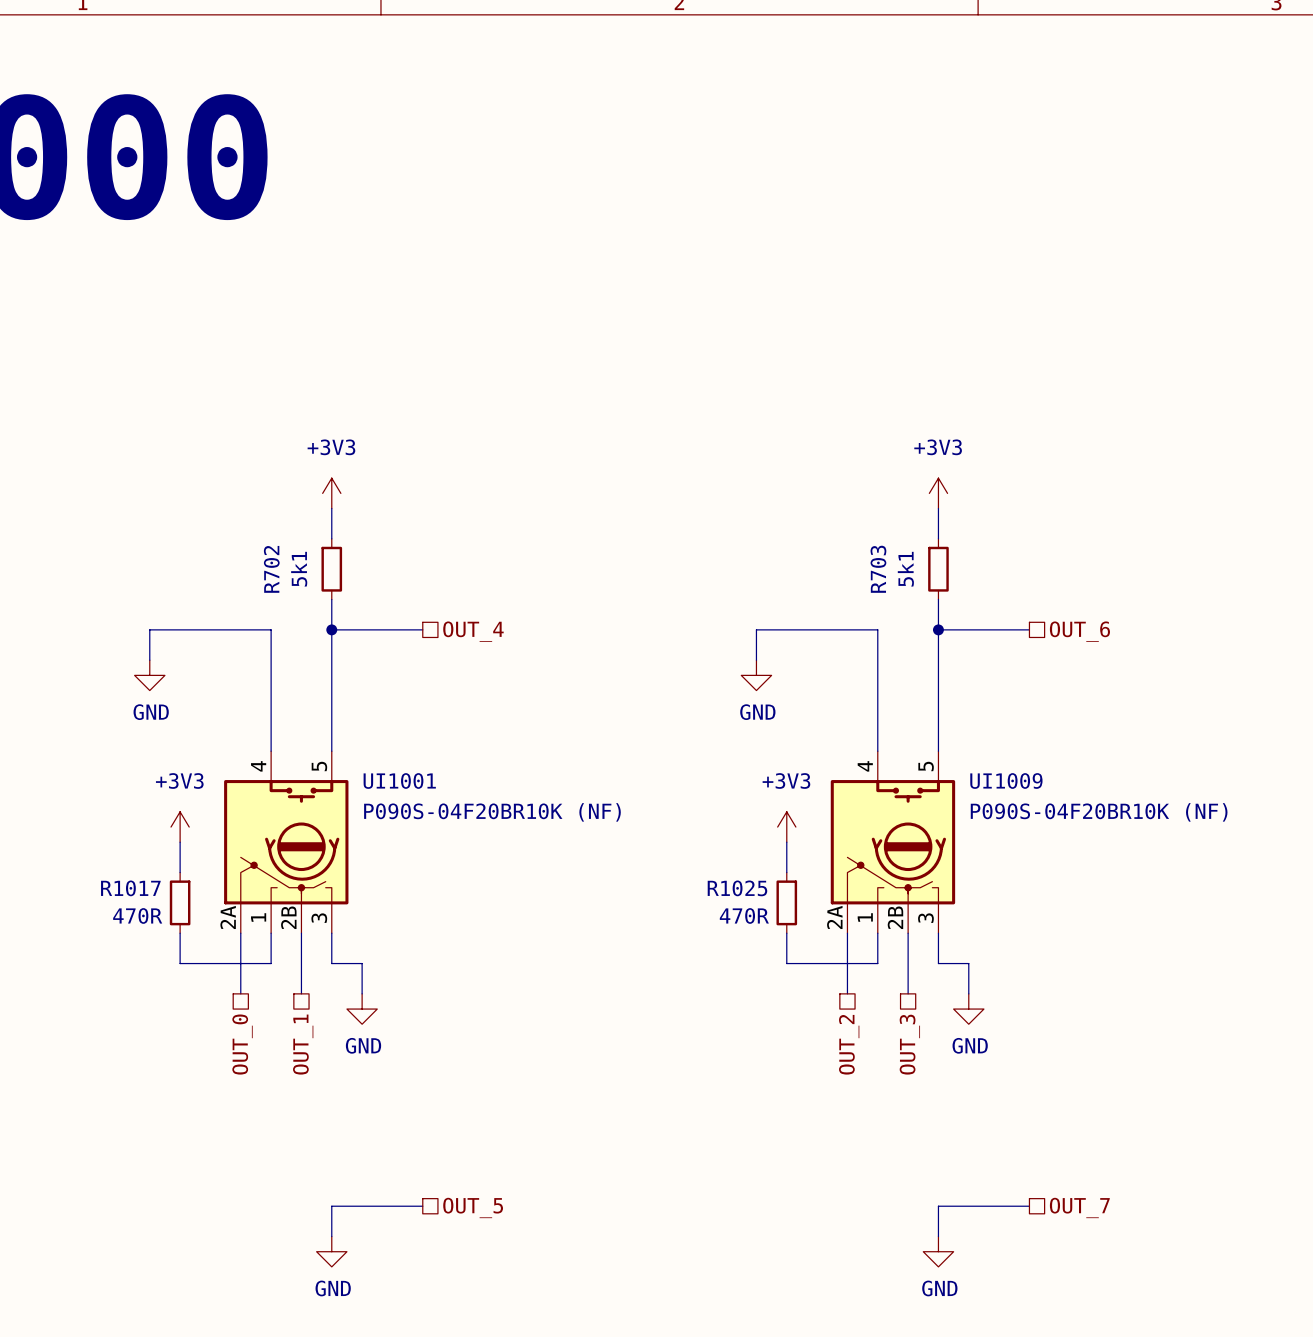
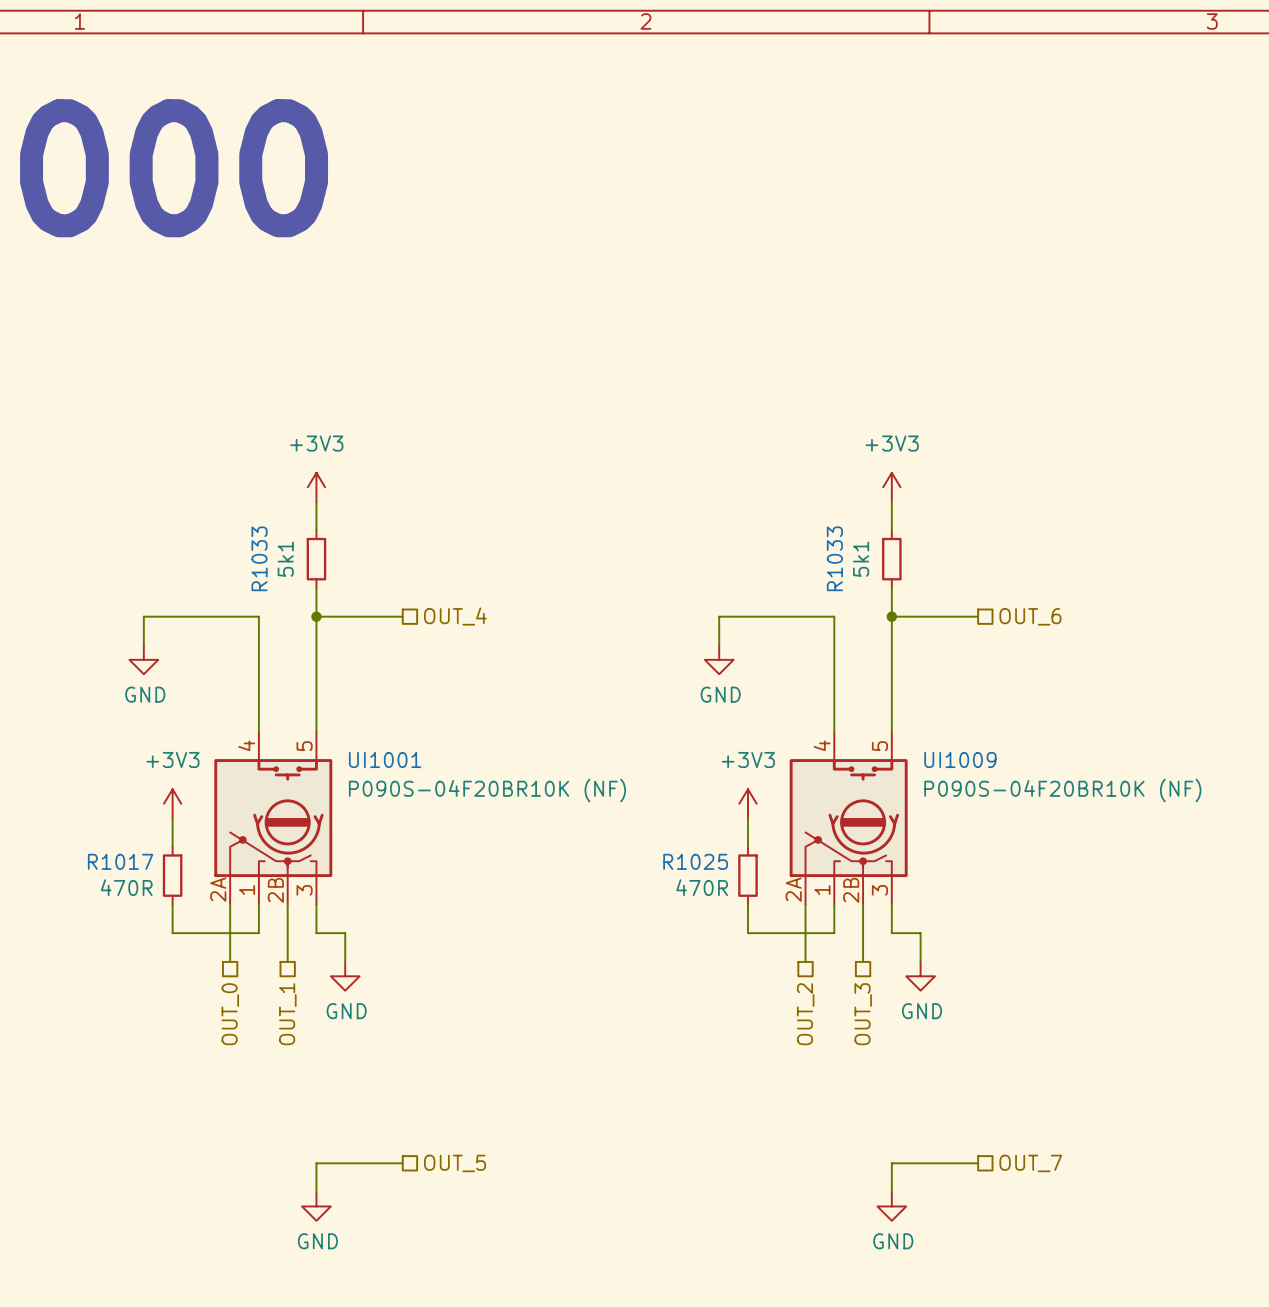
R702 name: R702 (271, 569) -> R1033 (259, 558)
R703 name: R703 (878, 569) -> R1033 (834, 558)

